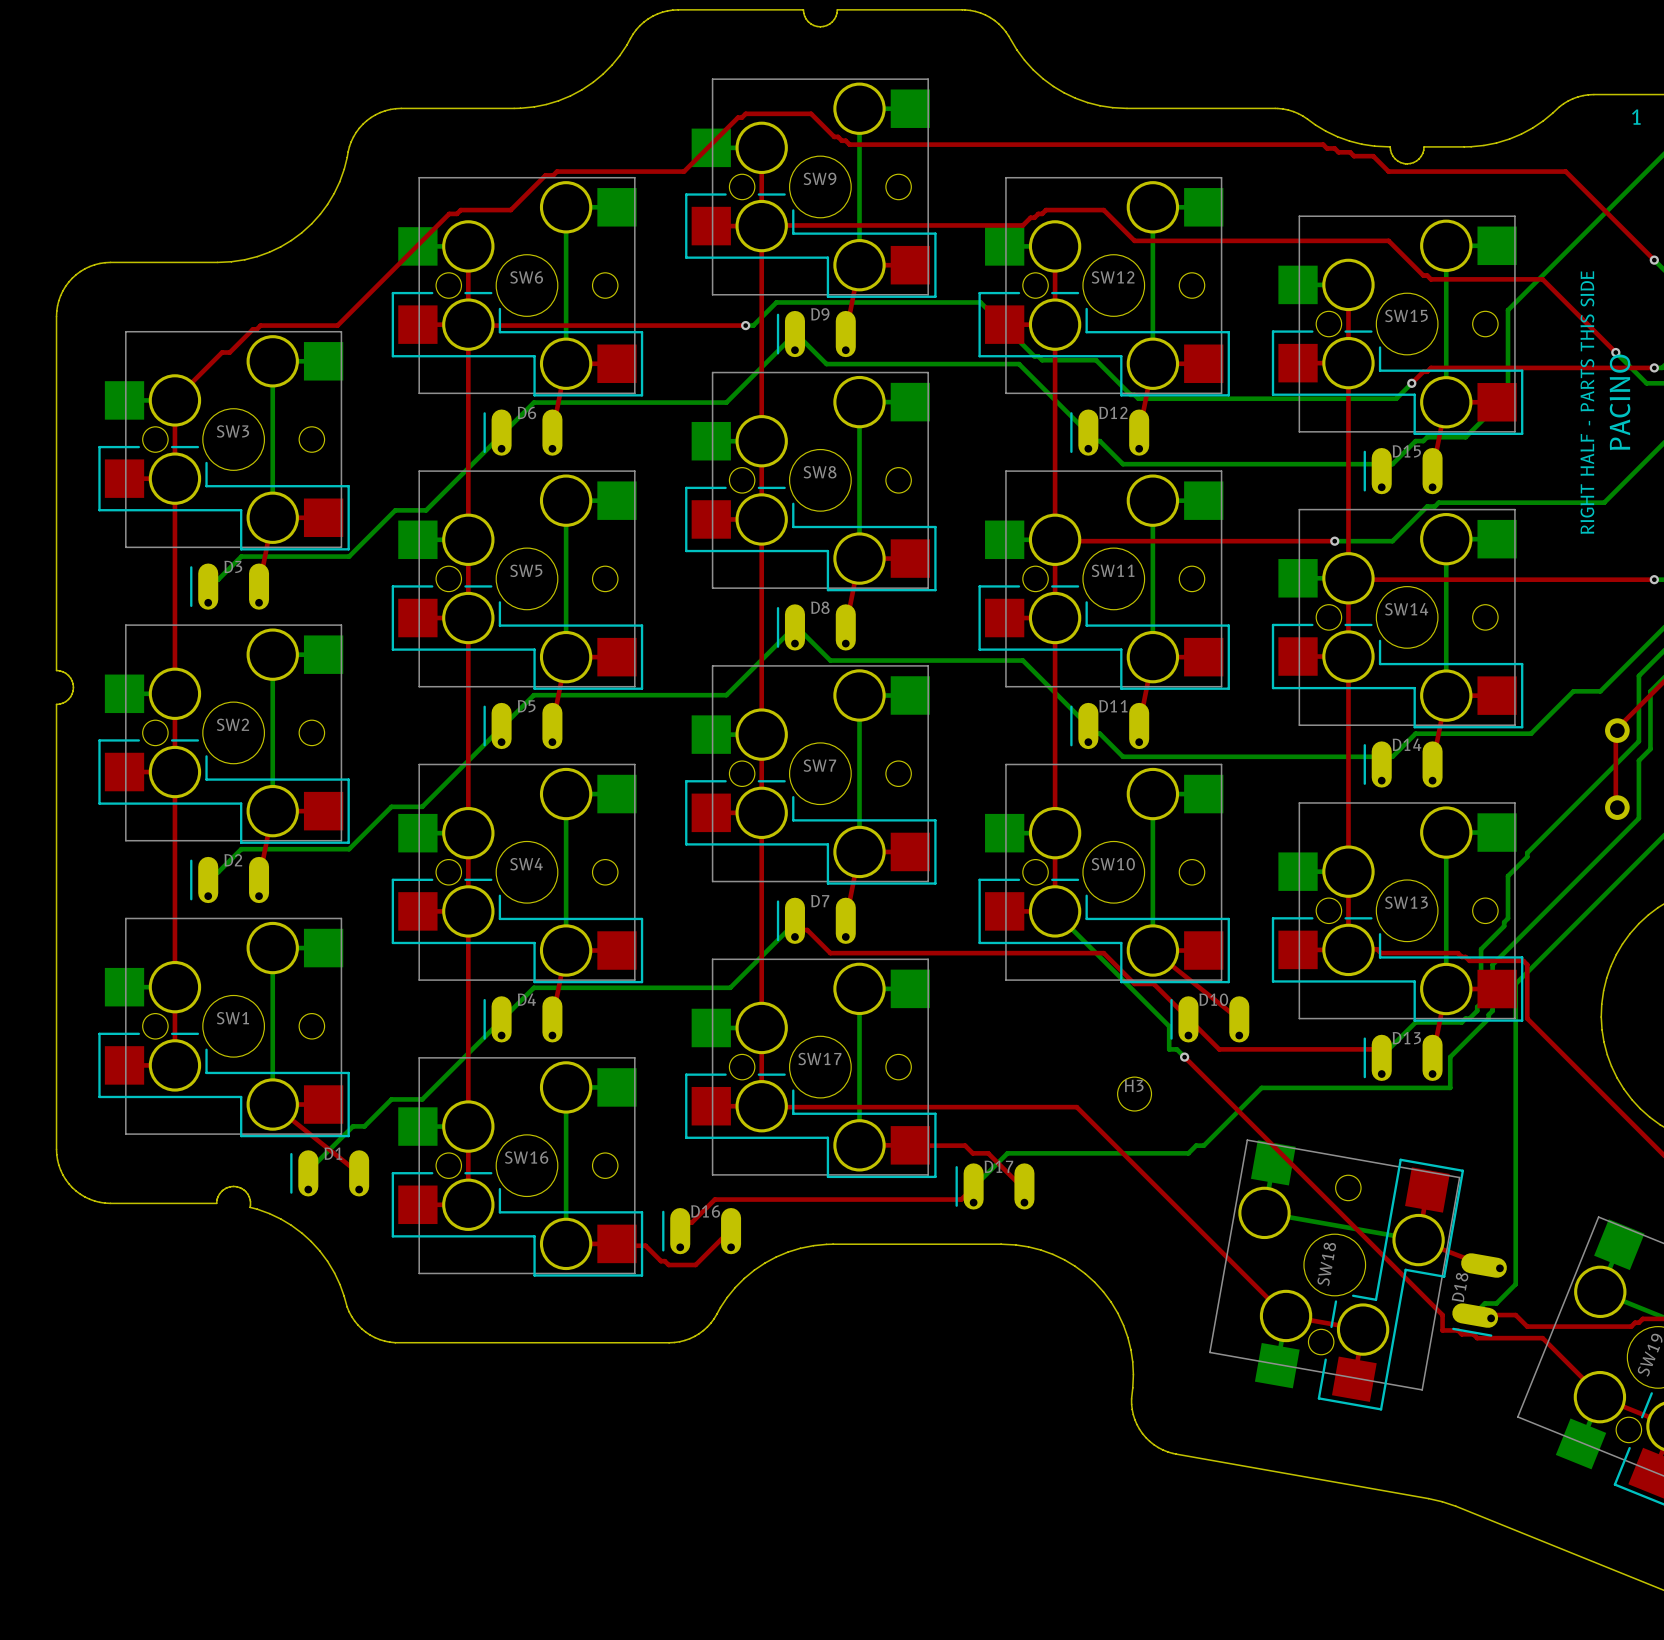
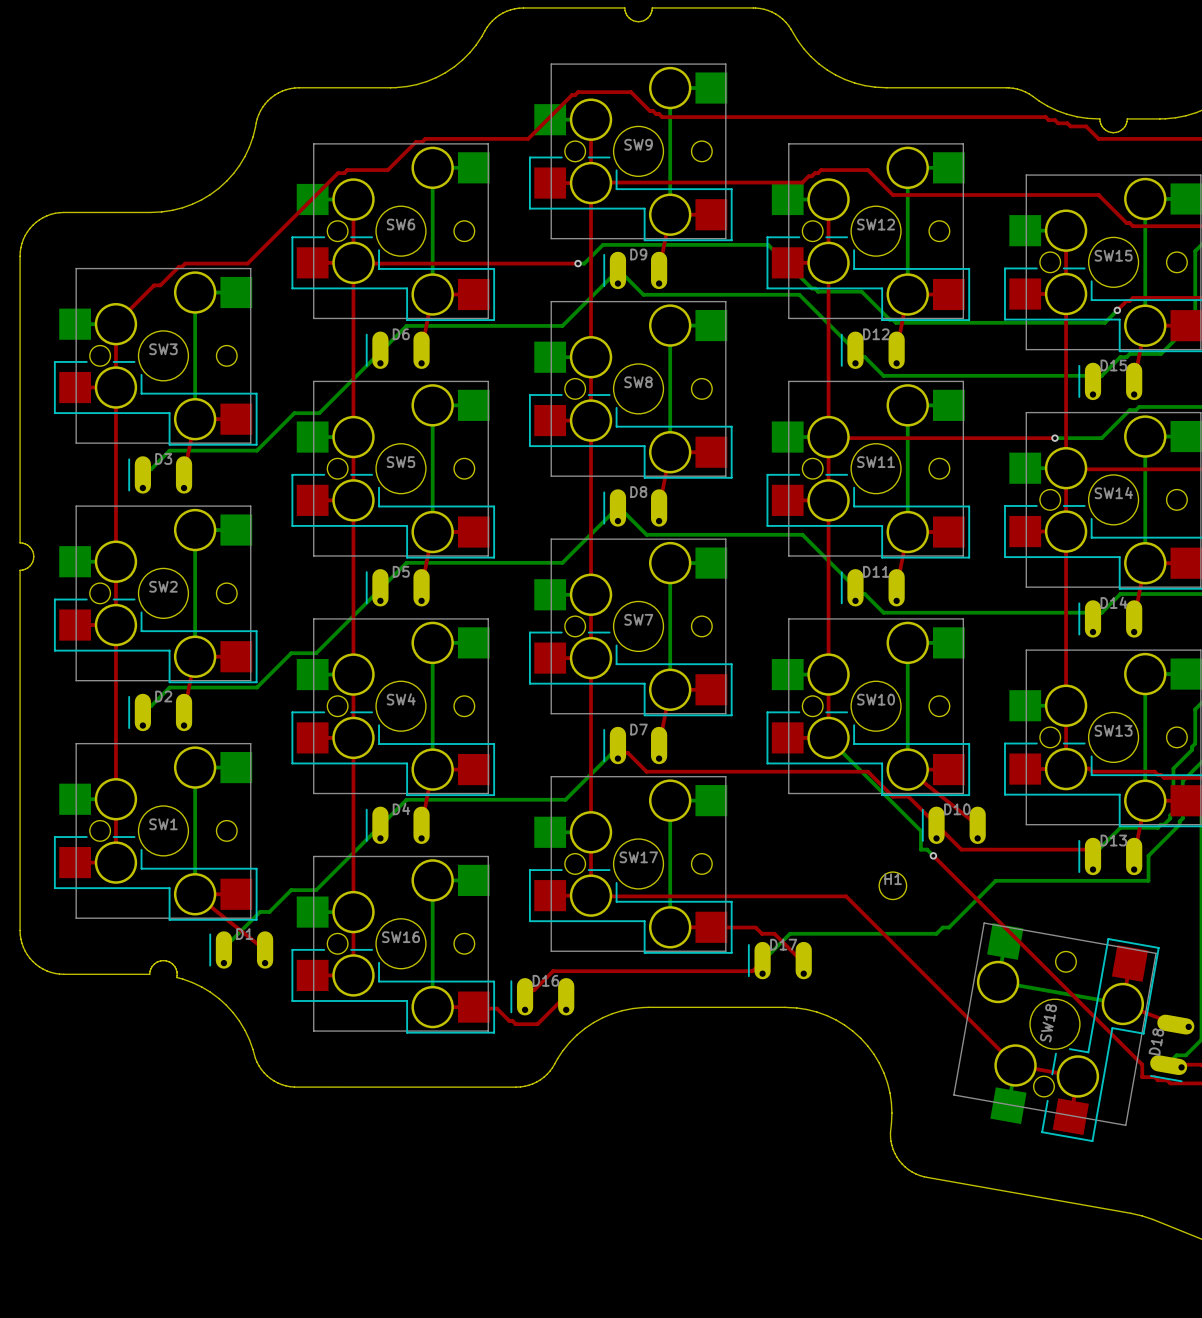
H3 name: H3 (1134, 1085) -> H1 (893, 879)

